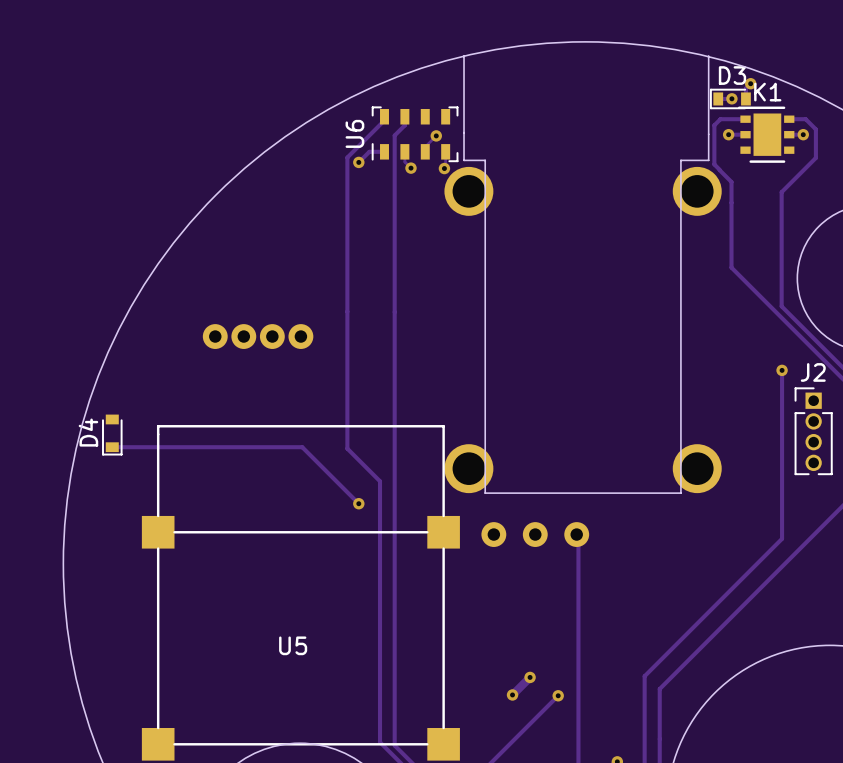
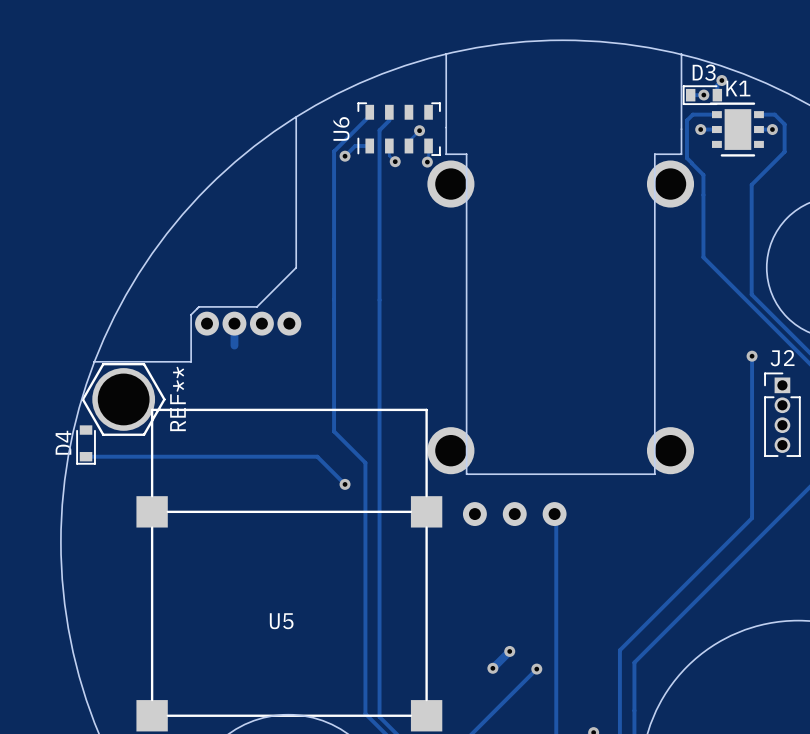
board edge: none -> (296, 117) (296, 267) (256, 306) (198, 306) (191, 314) (191, 361) (93, 361)
track: none -> (234, 323) (234, 345)
REF**: none -> (123, 399)
D4 position: (112, 435) -> (86, 445)
track: (112, 447) (302, 447) (330, 474) -> (86, 456) (317, 456)

